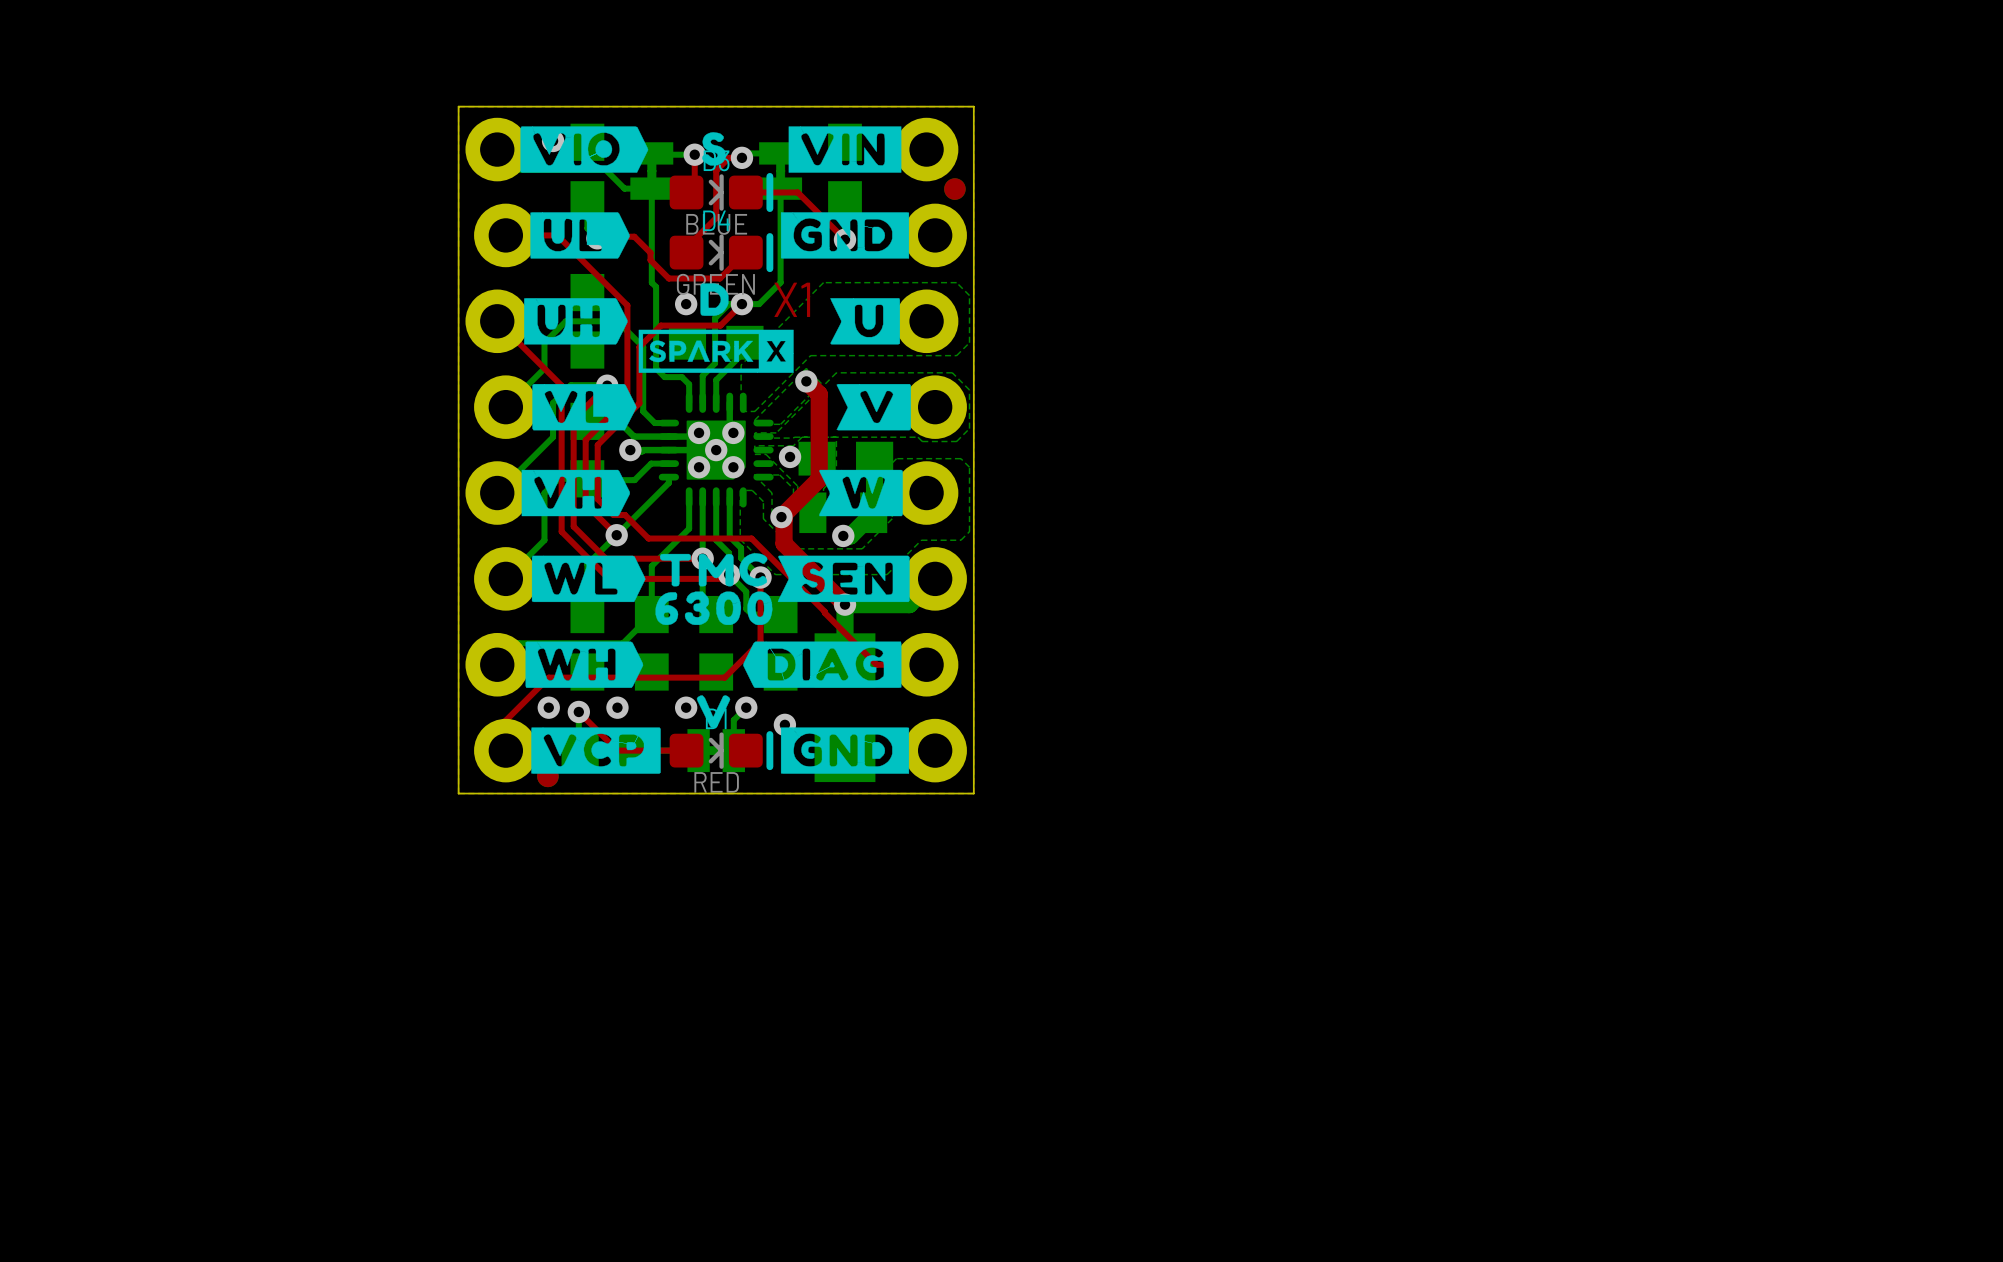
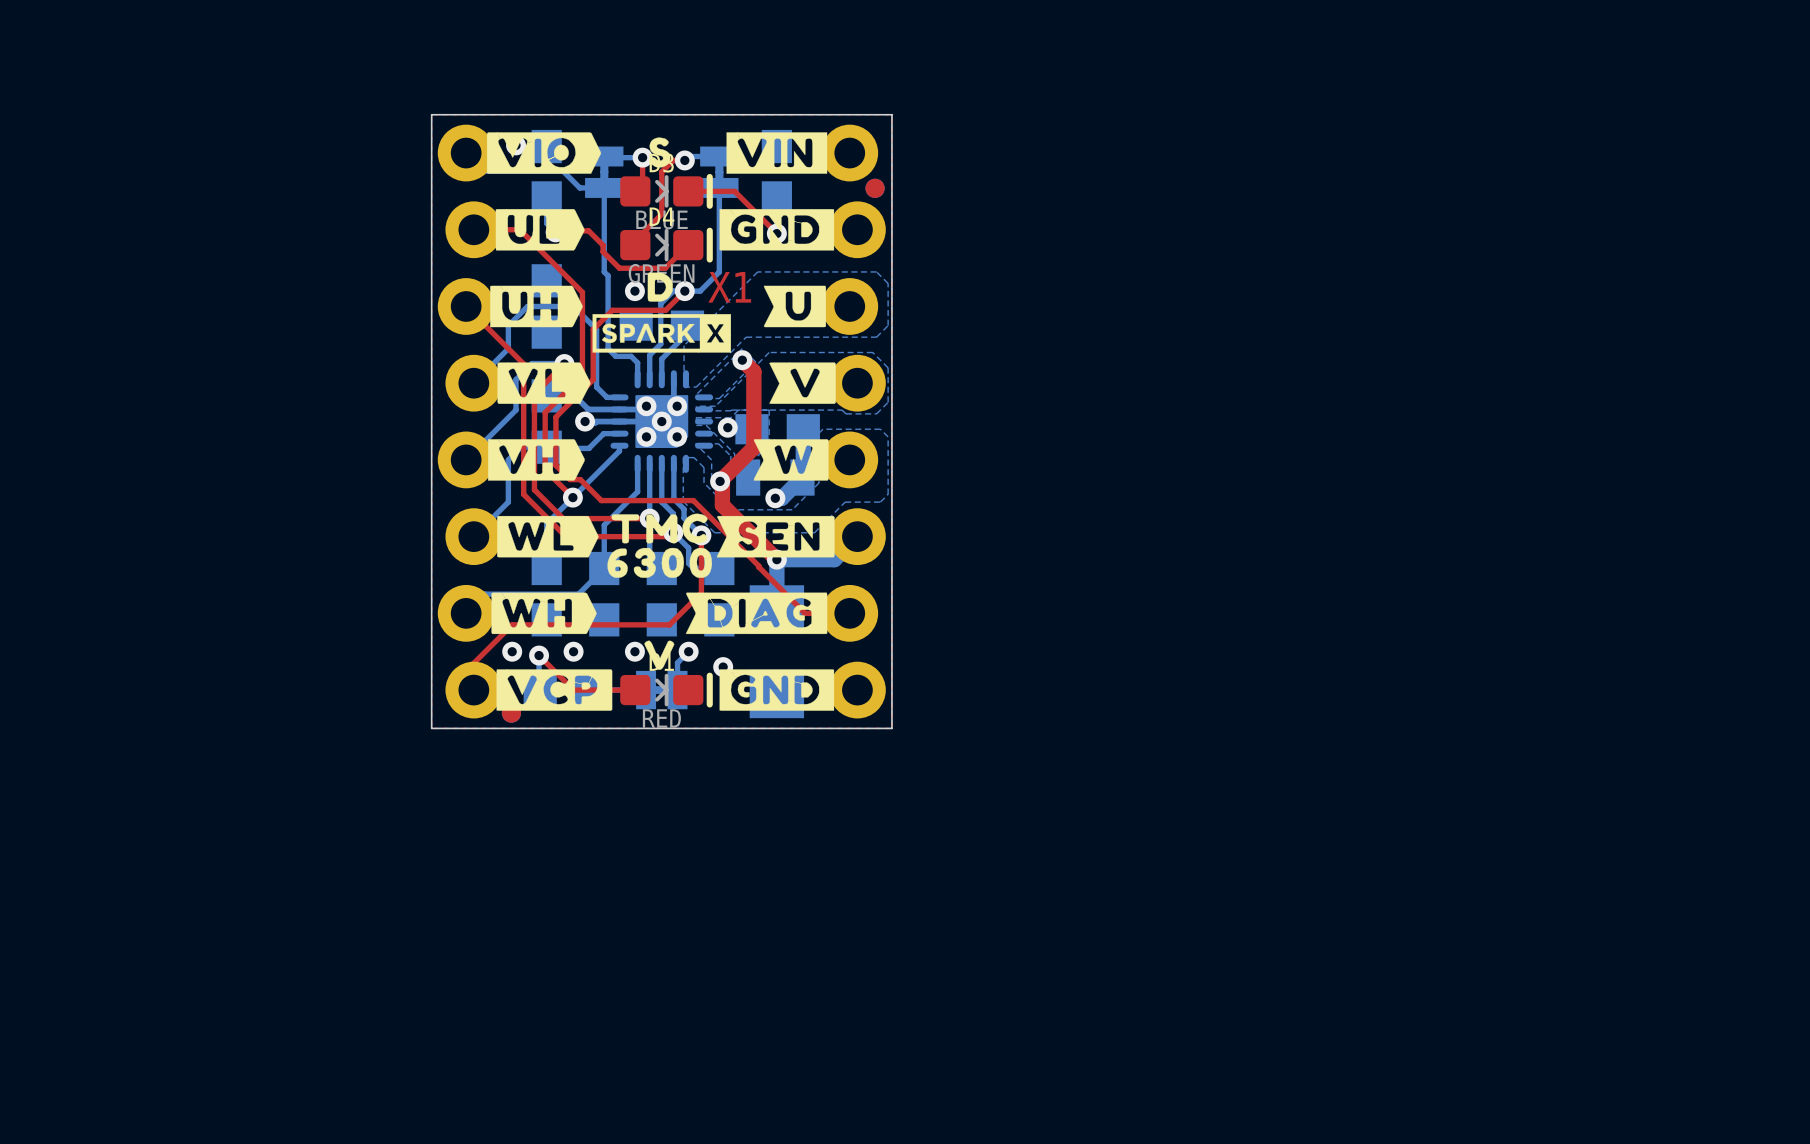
drawing shape: [743, 641, 902, 688] -> [685, 592, 828, 635]

